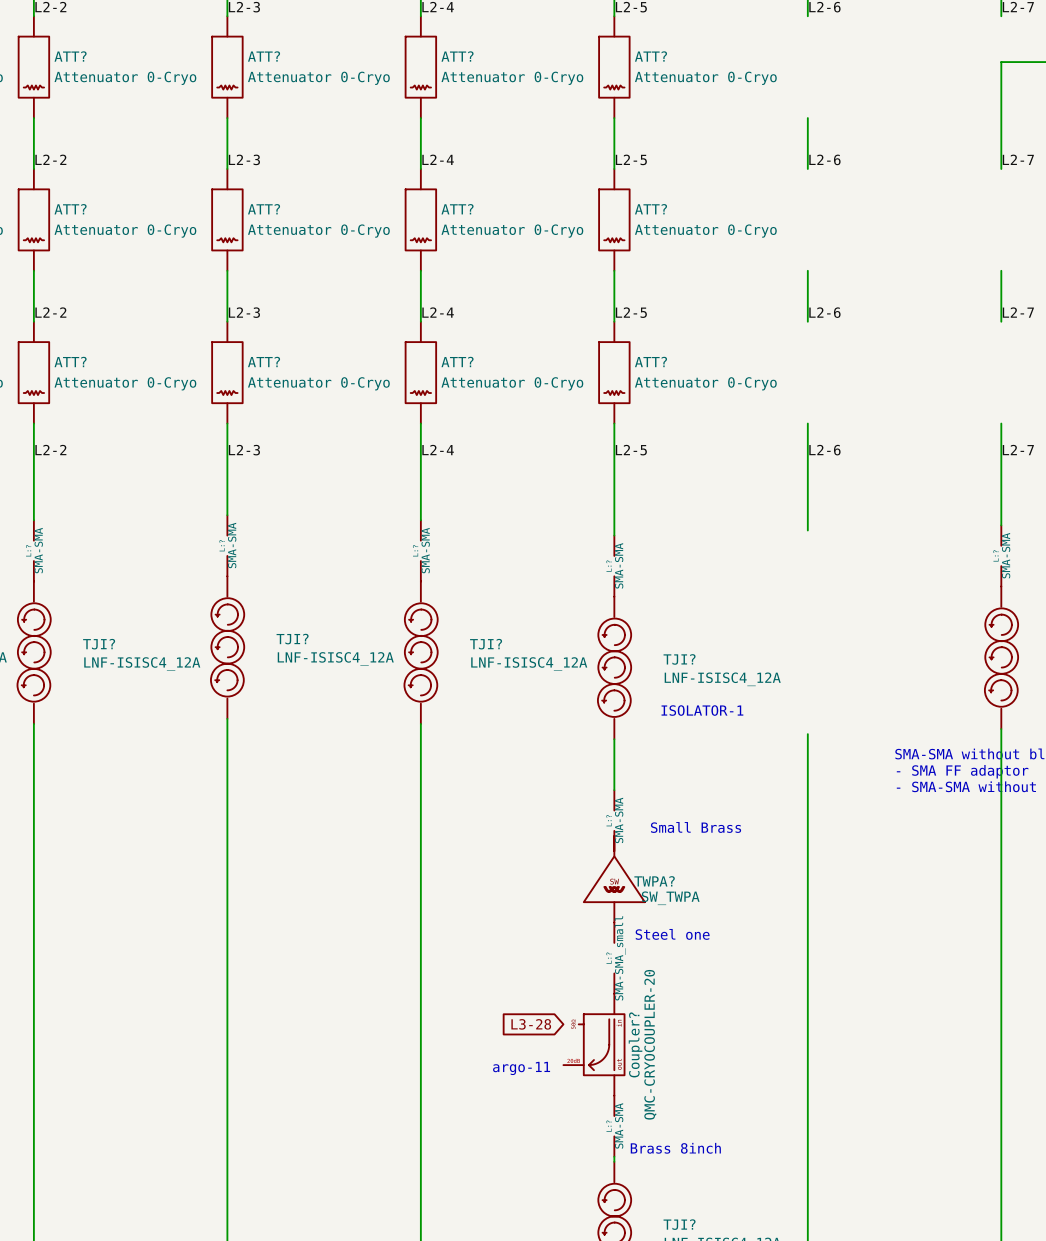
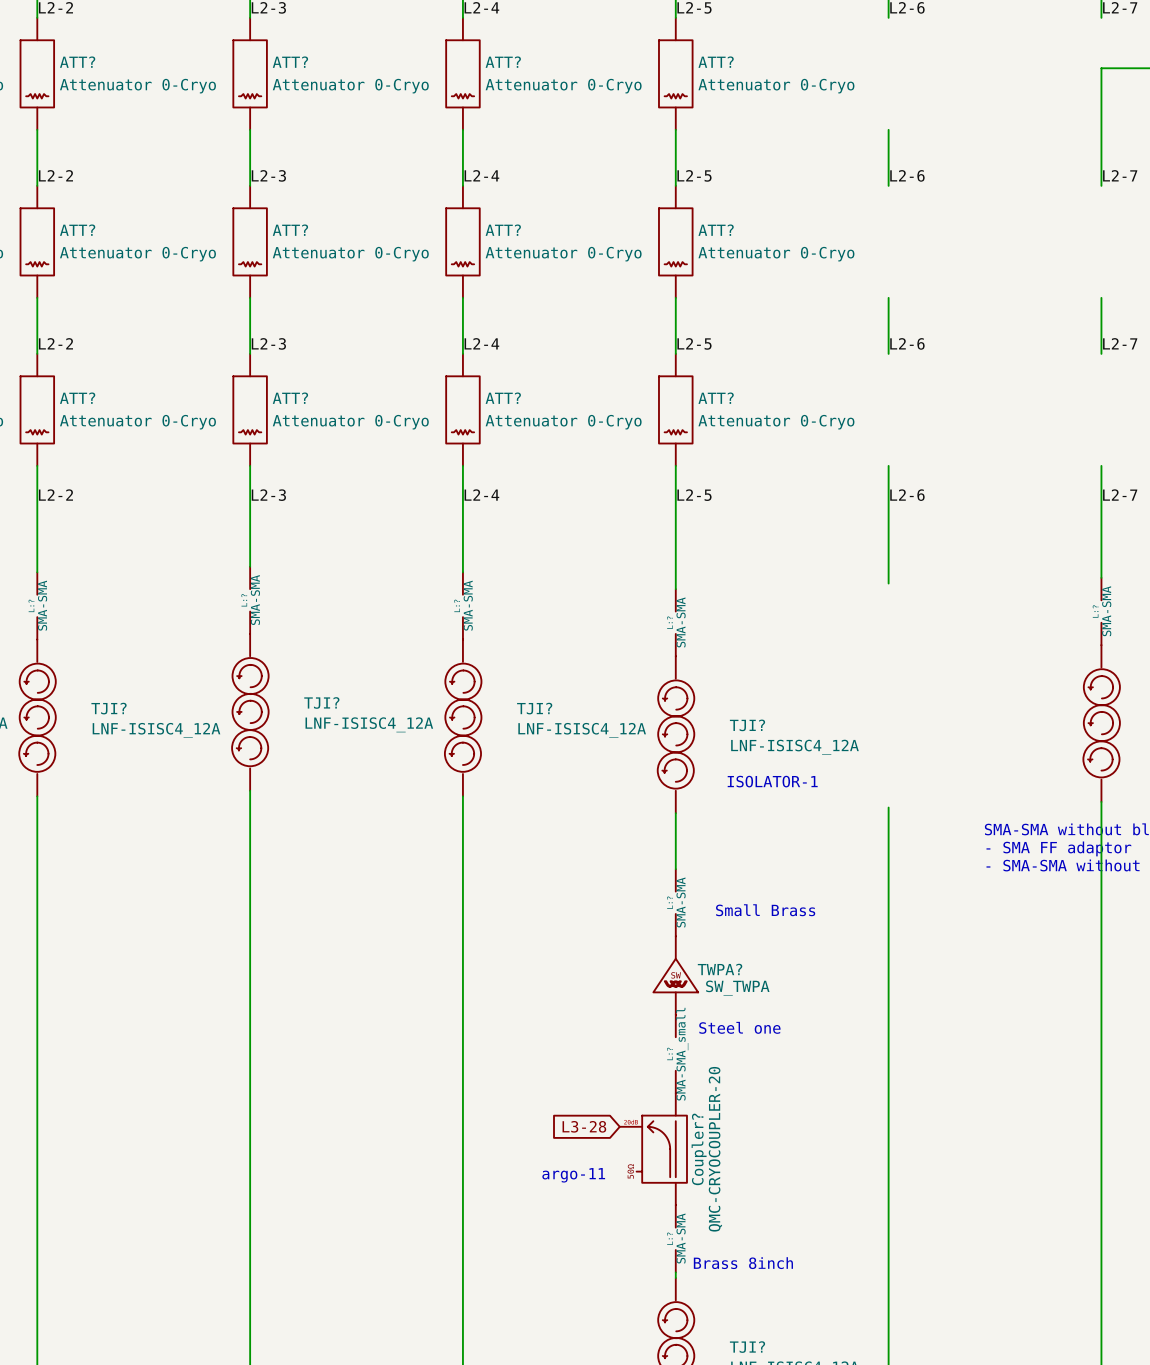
TWPA? symbol: [583, 835, 645, 923] -> [653, 936, 699, 1015]
Coupler? symbol: [563, 993, 625, 1096] -> [619, 1093, 687, 1206]

